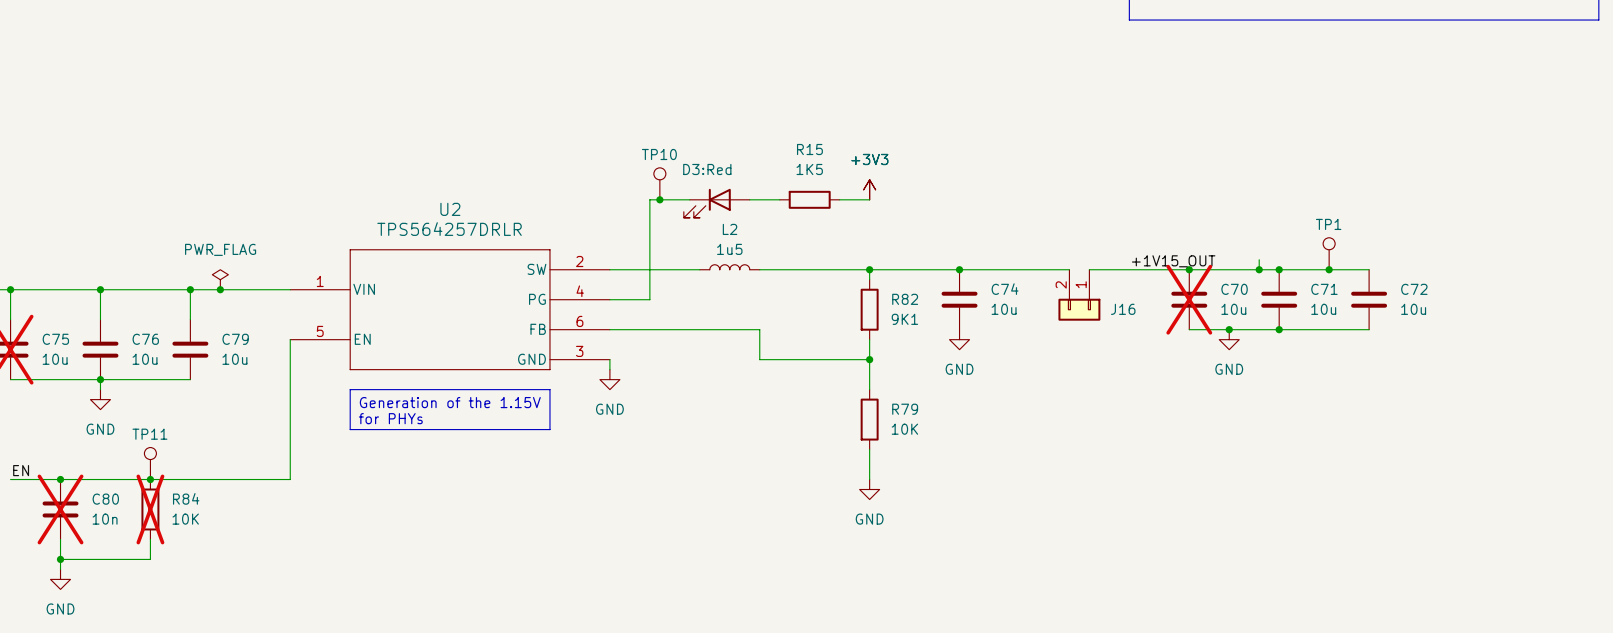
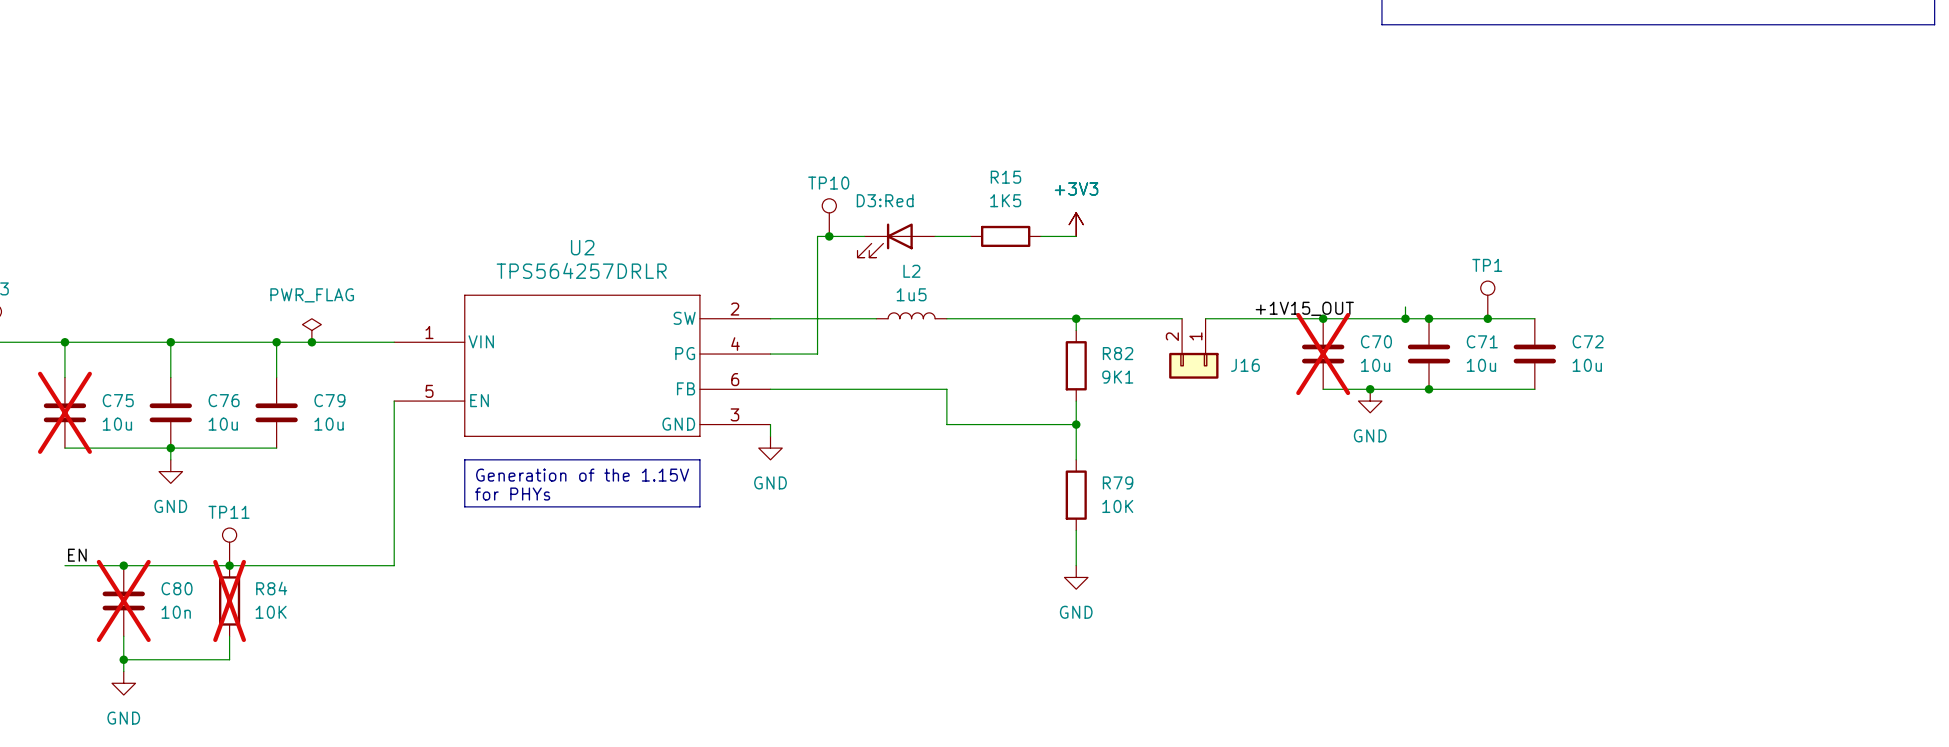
TP1 position: (1329, 253) -> (1487, 299)
wire: none -> (1405, 306) (1405, 318)
wire: (1259, 259) (1259, 269) (1369, 269) -> none
label position: +1V15_OUT (1173, 261) -> +1V15_OUT (1304, 308)
wire: (959, 269) (979, 269) -> (1311, 318) (1334, 318)
junction: (959, 269) -> none
junction: none -> (1323, 318)
junction: none -> (1405, 318)
junction: none -> (1429, 318)
junction: (1189, 269) -> none
junction: none -> (1487, 318)
junction: (1259, 269) -> none
junction: (1279, 269) -> none
junction: (1329, 269) -> none
J16 position: (1079, 295) -> (1193, 348)
C74: 10u (959, 299) -> none
C70 position: (1189, 299) -> (1323, 354)
C71 position: (1279, 299) -> (1429, 354)
C72 position: (1369, 299) -> (1534, 354)
junction: none -> (1370, 389)
junction: none -> (1429, 389)
junction: (1229, 329) -> none
wire: (1259, 329) (1369, 329) -> (1323, 389) (1452, 389)
junction: (1279, 329) -> none
power symbol: GND (959, 339) -> none
power symbol: none -> GND (1370, 401)
power symbol: GND (1229, 339) -> none

